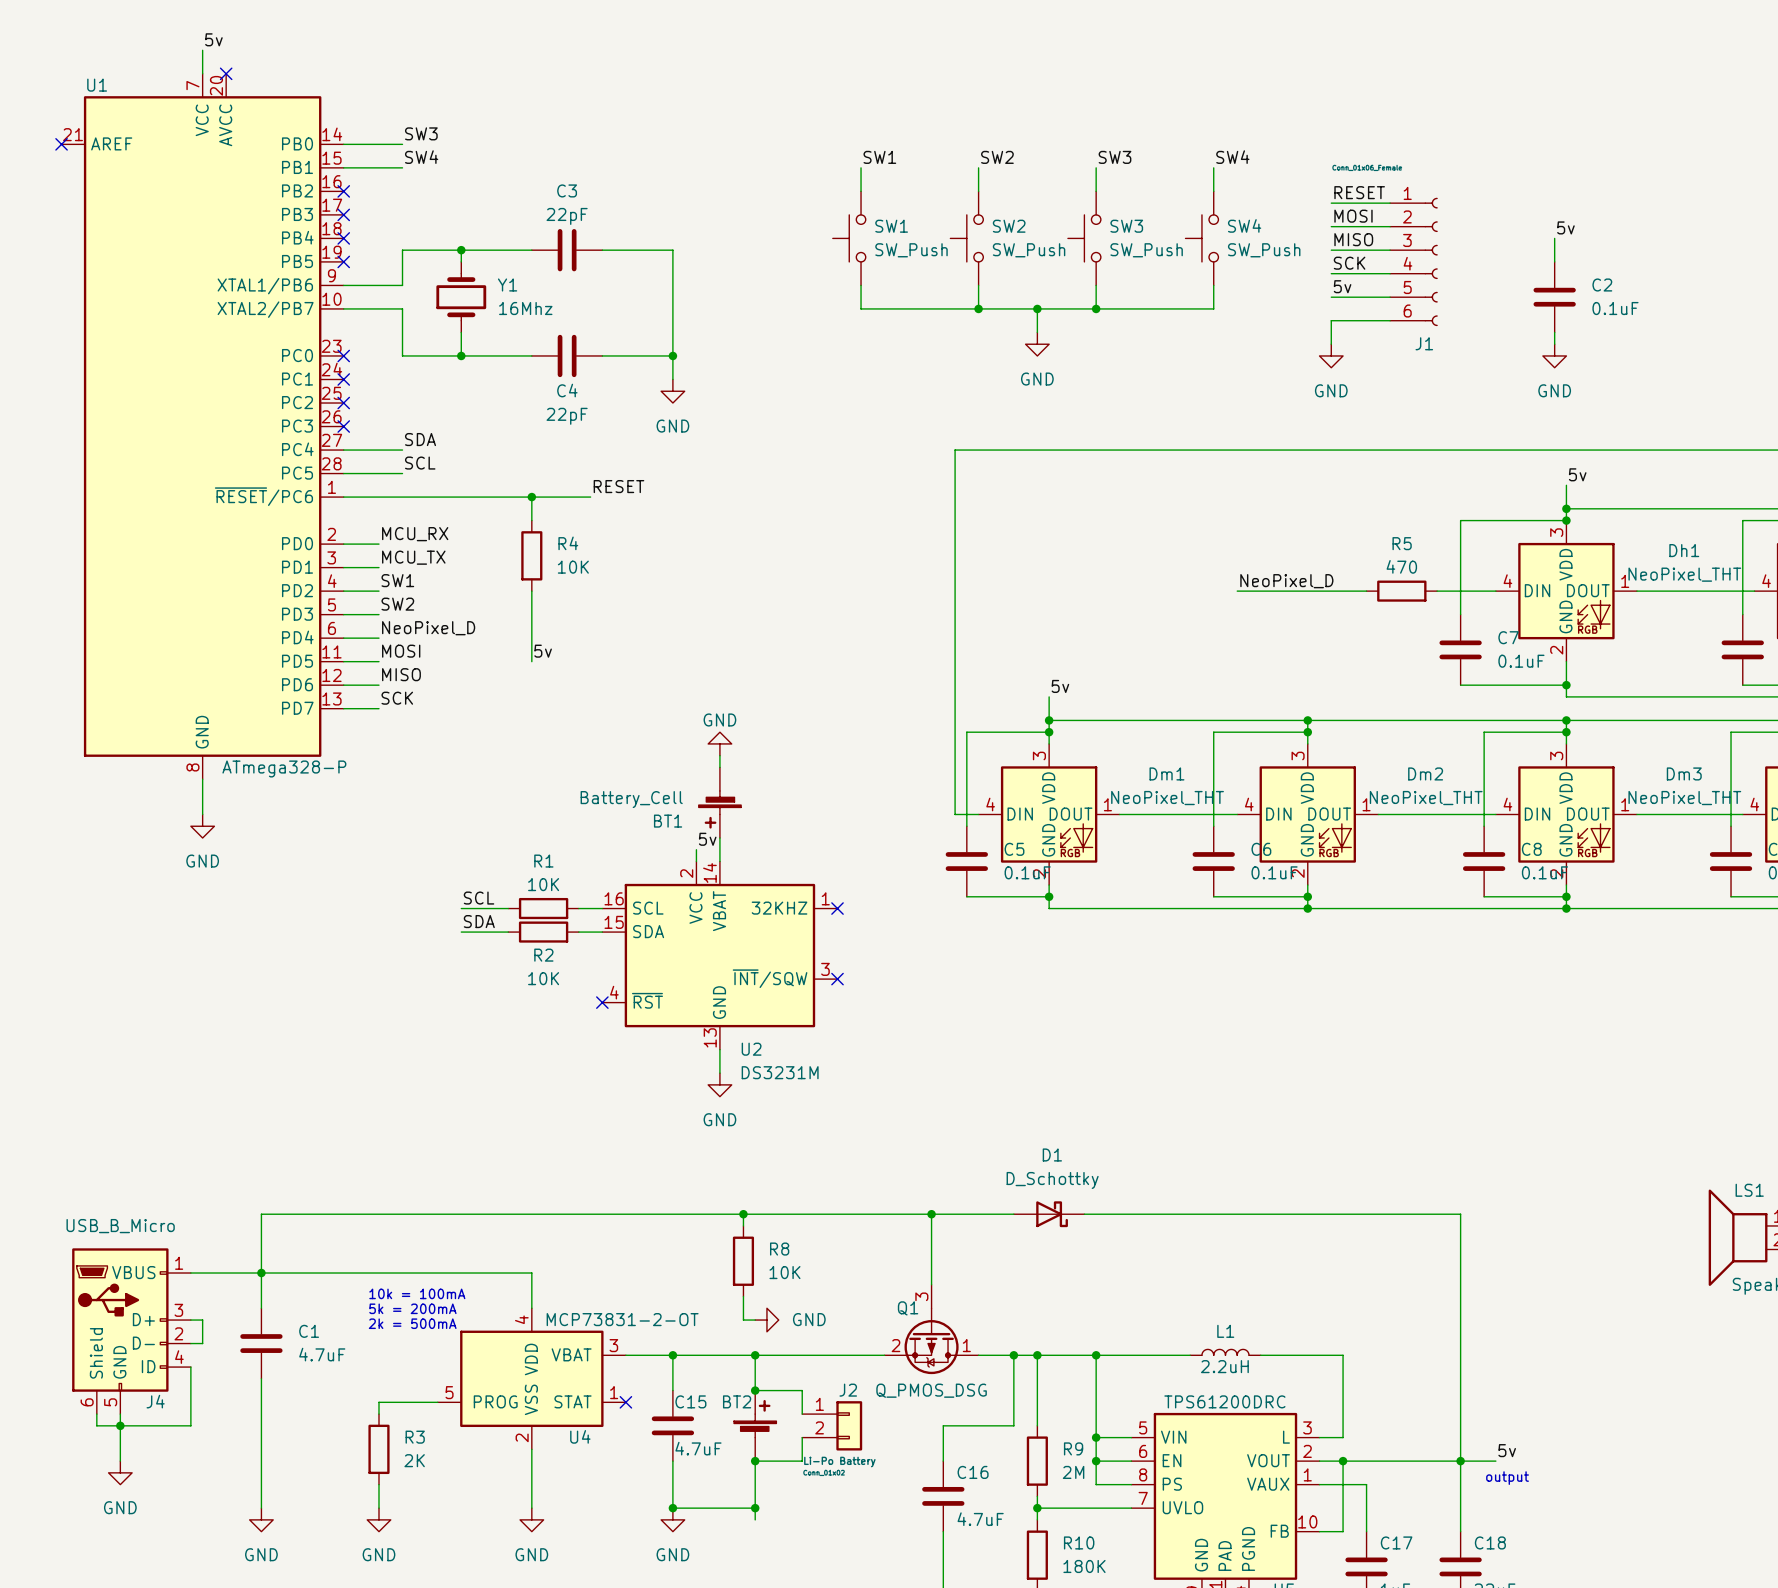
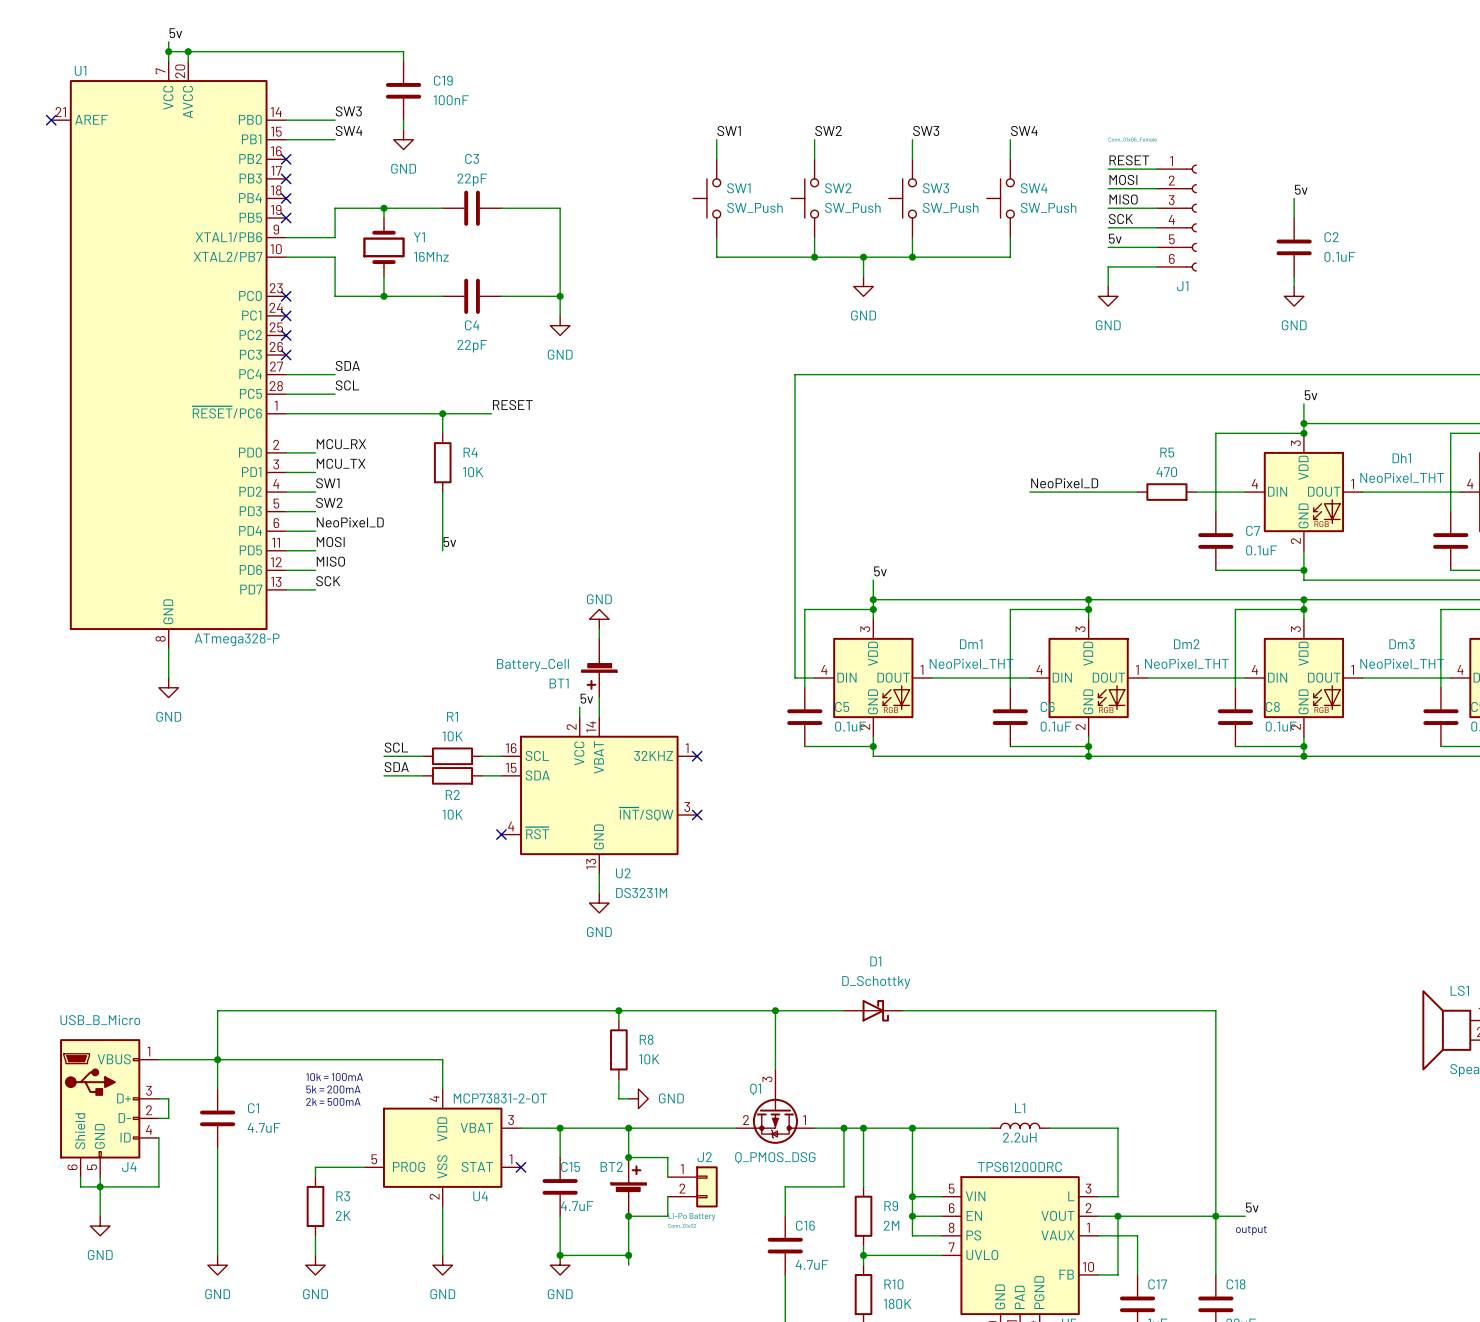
wire: none -> (168, 51) (403, 51) (403, 61)
junction: none -> (168, 51)
wire: none -> (188, 51) (188, 61)
junction: none -> (188, 51)
no-connect mark: (226, 73) -> none
C19: none -> 100nF (403, 90)
wire: none -> (403, 120) (403, 129)
power symbol: none -> GND (403, 139)

